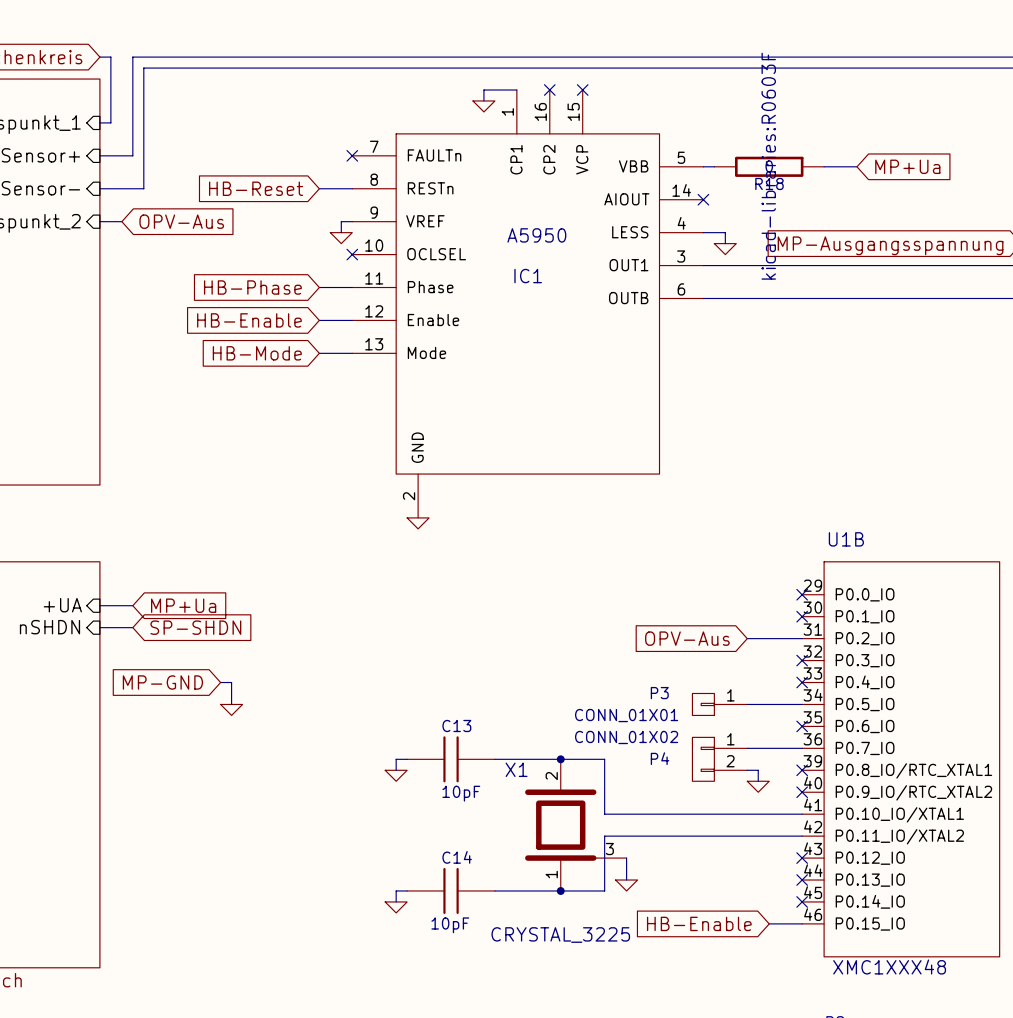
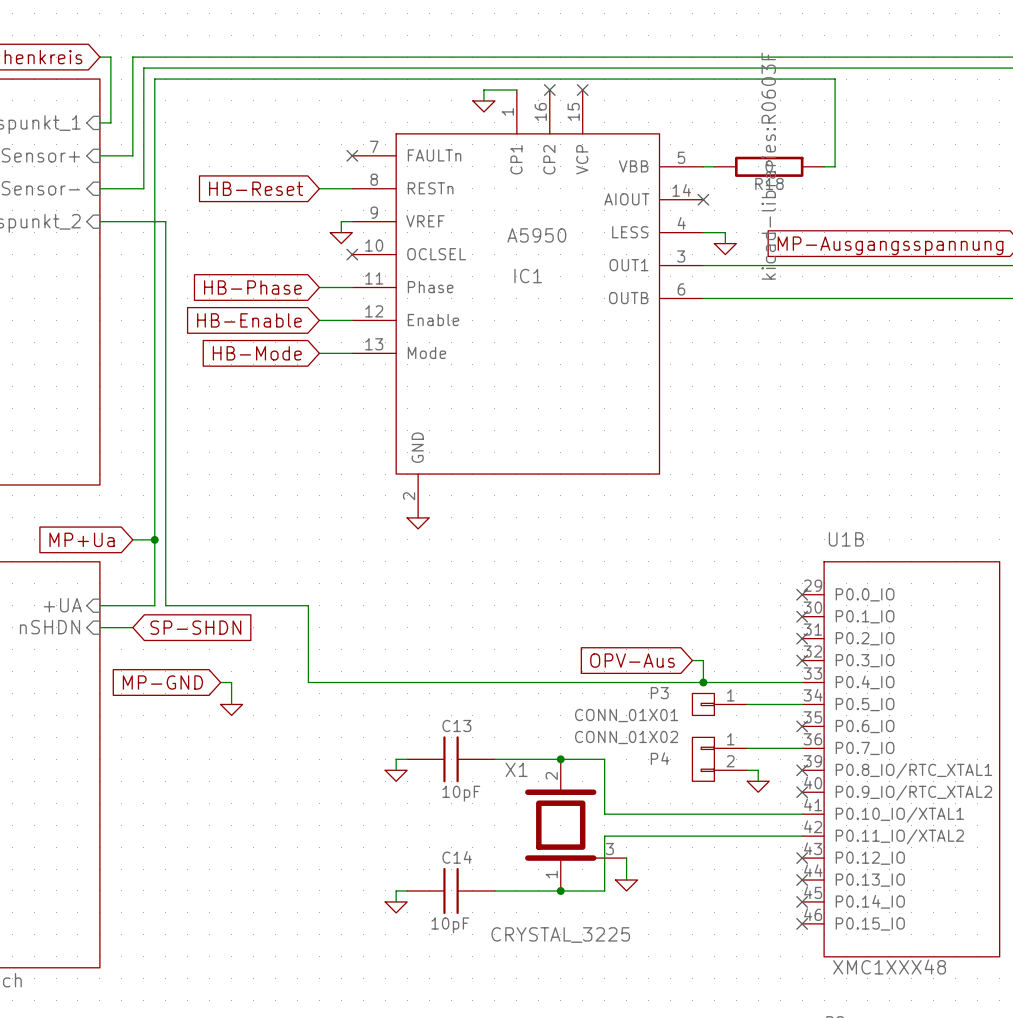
wire: (835, 166) (857, 166) -> (835, 166) (835, 79) (154, 79) (154, 605) (132, 605)
global label: MP+Ua (907, 166) -> none
wire: none -> (121, 221) (165, 221) (165, 605) (308, 605) (308, 682) (802, 682)
global label: OPV-Aus (181, 221) -> none
wire: none -> (132, 539) (154, 539)
junction: none -> (154, 539)
global label rotation: 0° (183, 605) -> 180° (82, 539)
global label position: MP+Ua (183, 605) -> MP+Ua (82, 539)
global label position: OPV-Aus (687, 638) -> OPV-Aus (632, 660)
wire: (747, 638) (802, 638) -> none
wire: none -> (692, 660) (703, 660) (703, 682)
junction: none -> (703, 682)
no-connect mark position: (802, 682) -> (802, 638)
global label: HB-Enable (699, 923) -> none
wire: (769, 923) (802, 923) -> none
no-connect mark: none -> (802, 923)

